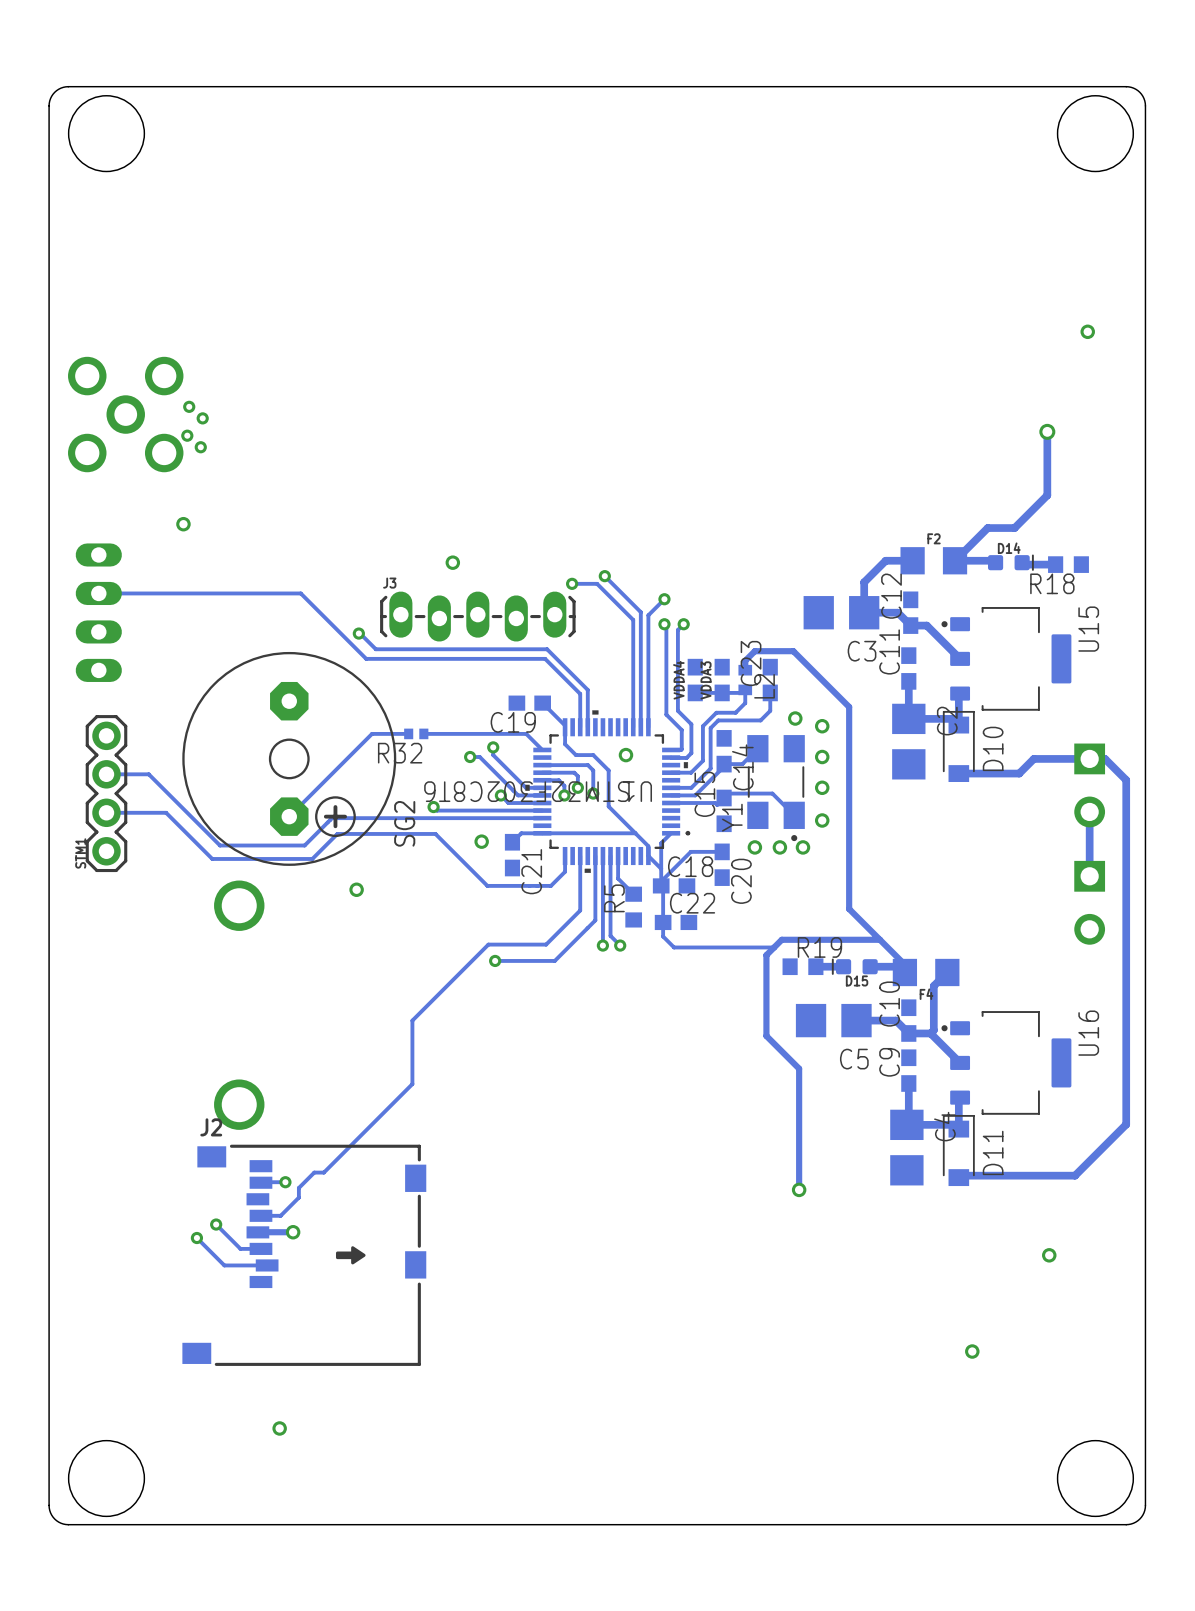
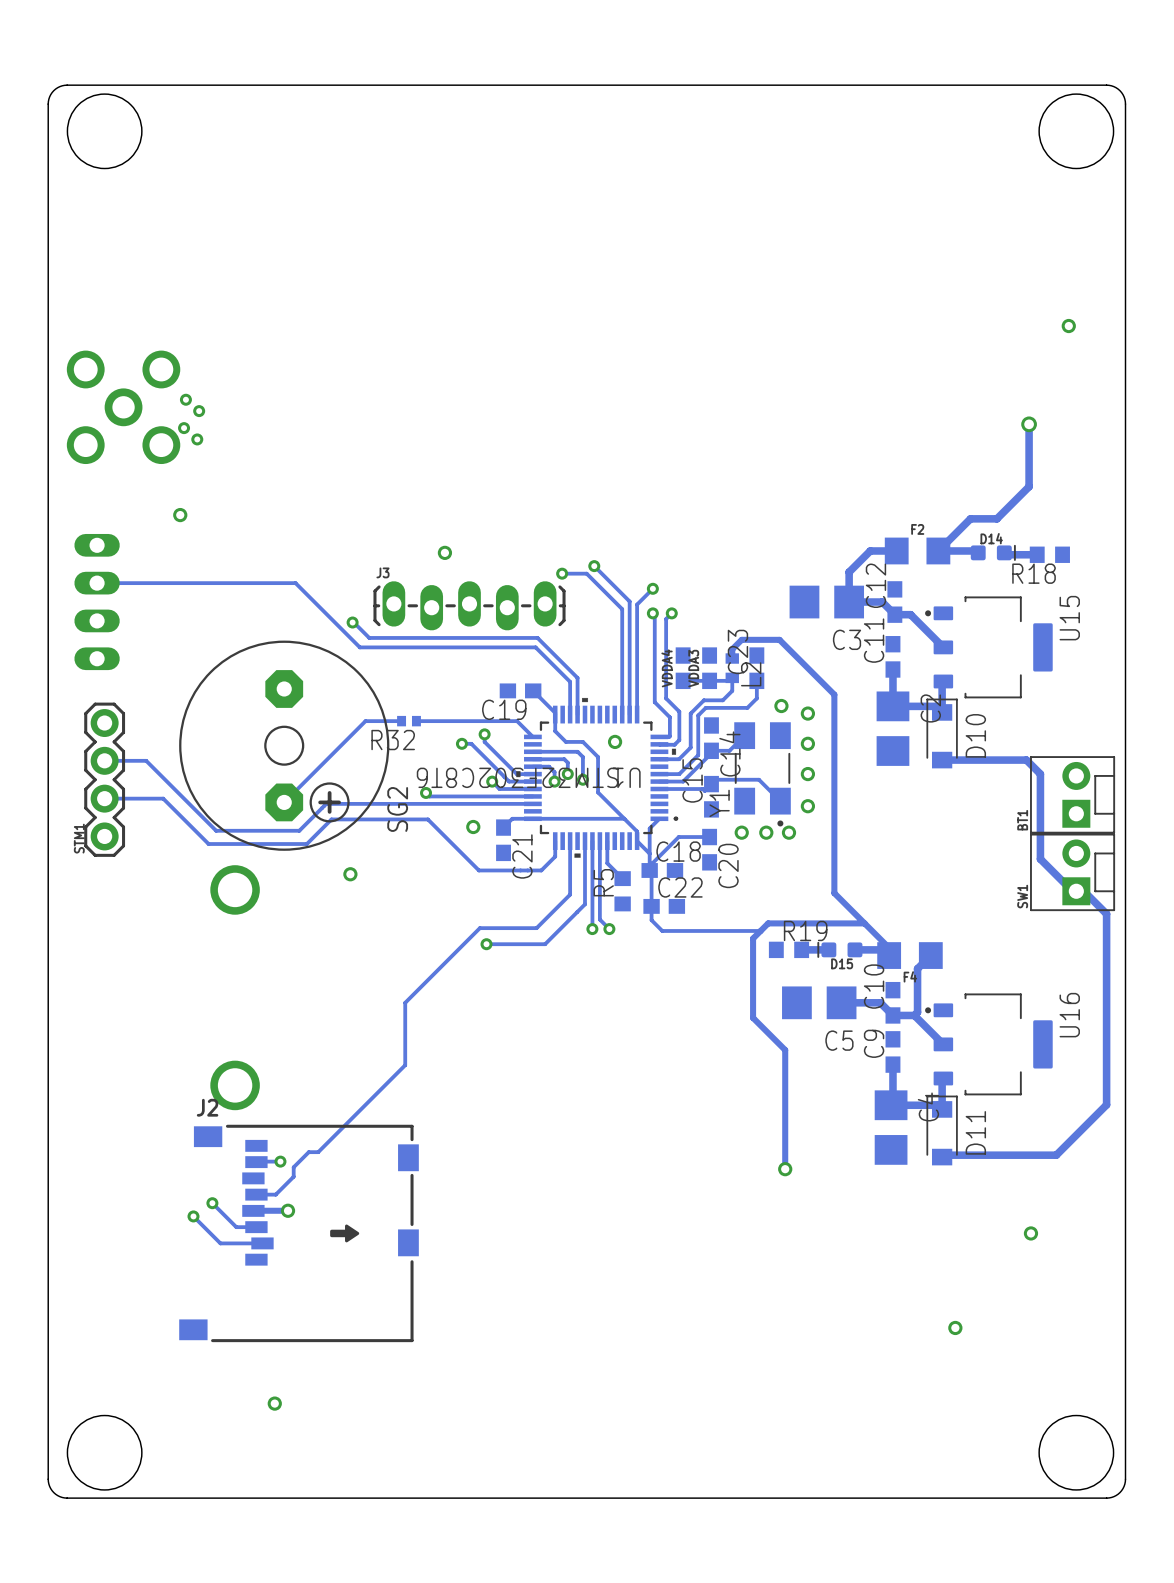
track: (1019, 773) (1033, 758) (1105, 758) (1126, 780) (1126, 930) -> (1001, 760) (1026, 760) (1040, 774) (1040, 859) (1072, 891) (1083, 891) (1106, 913)
part: (1089, 785) -> none
BT1: none -> (1072, 794)
track: (1089, 811) (1089, 876) -> none
SW1: none -> (1072, 872)
part: (1089, 902) -> none

